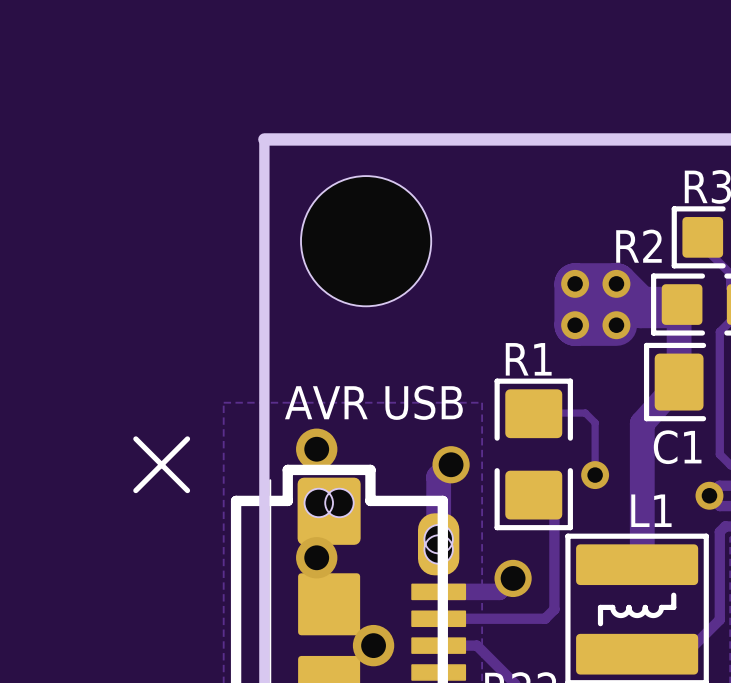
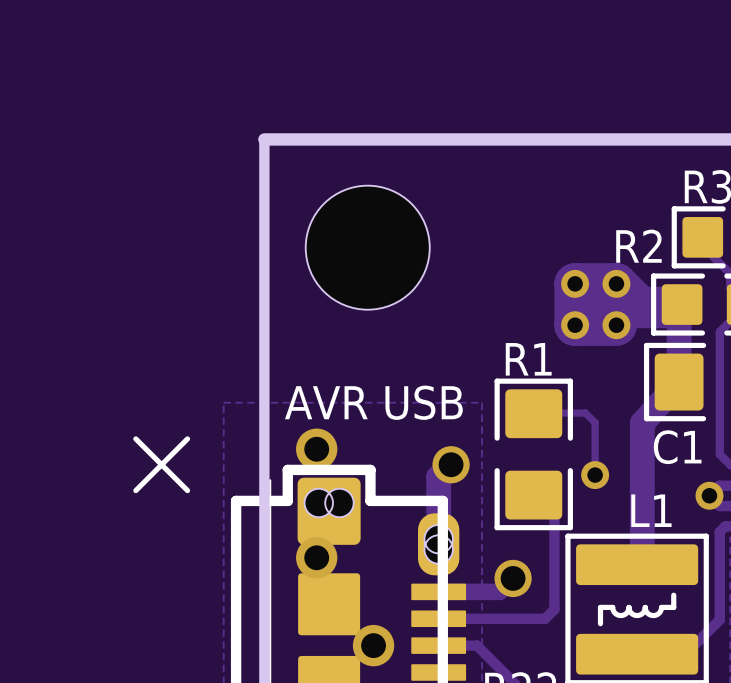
hole: (366, 241) -> none
part: none -> (367, 247)

